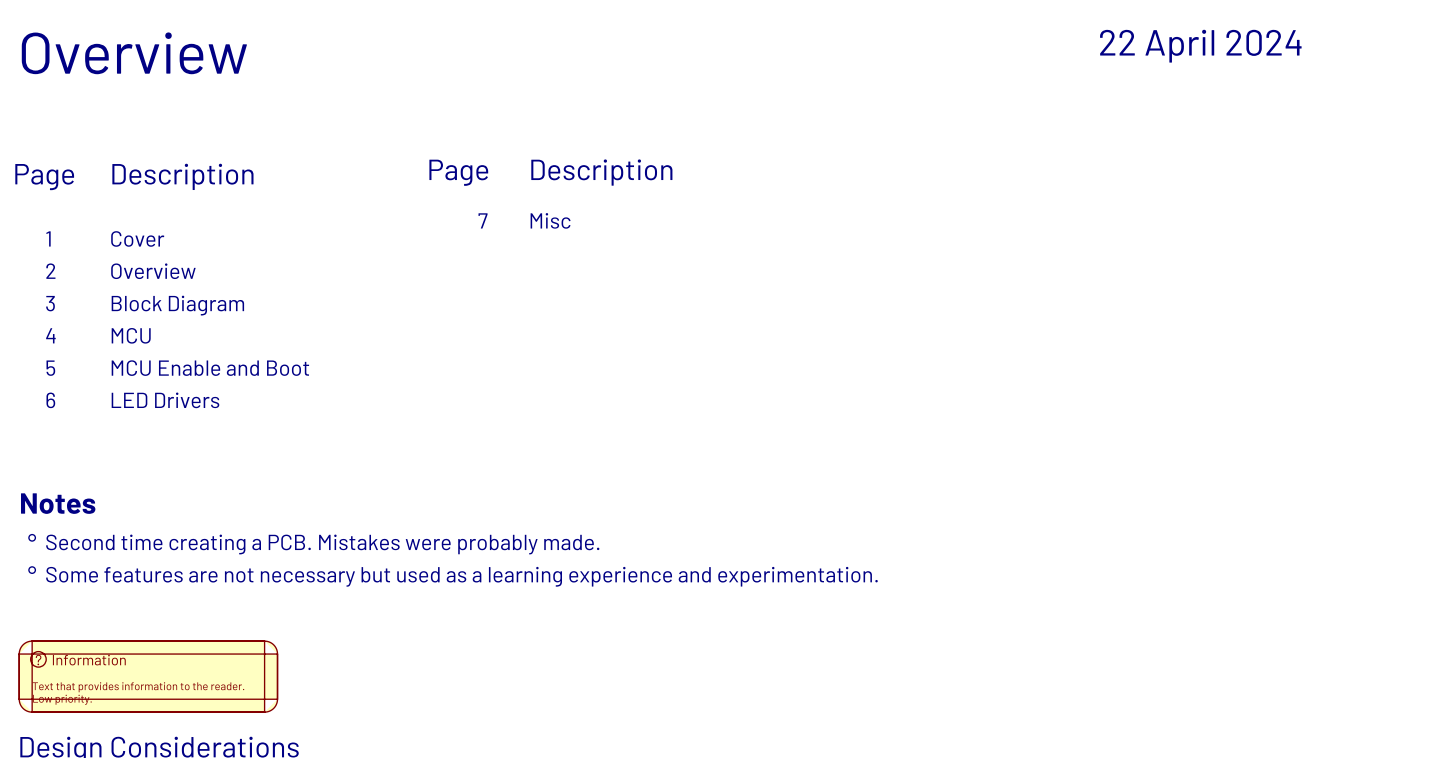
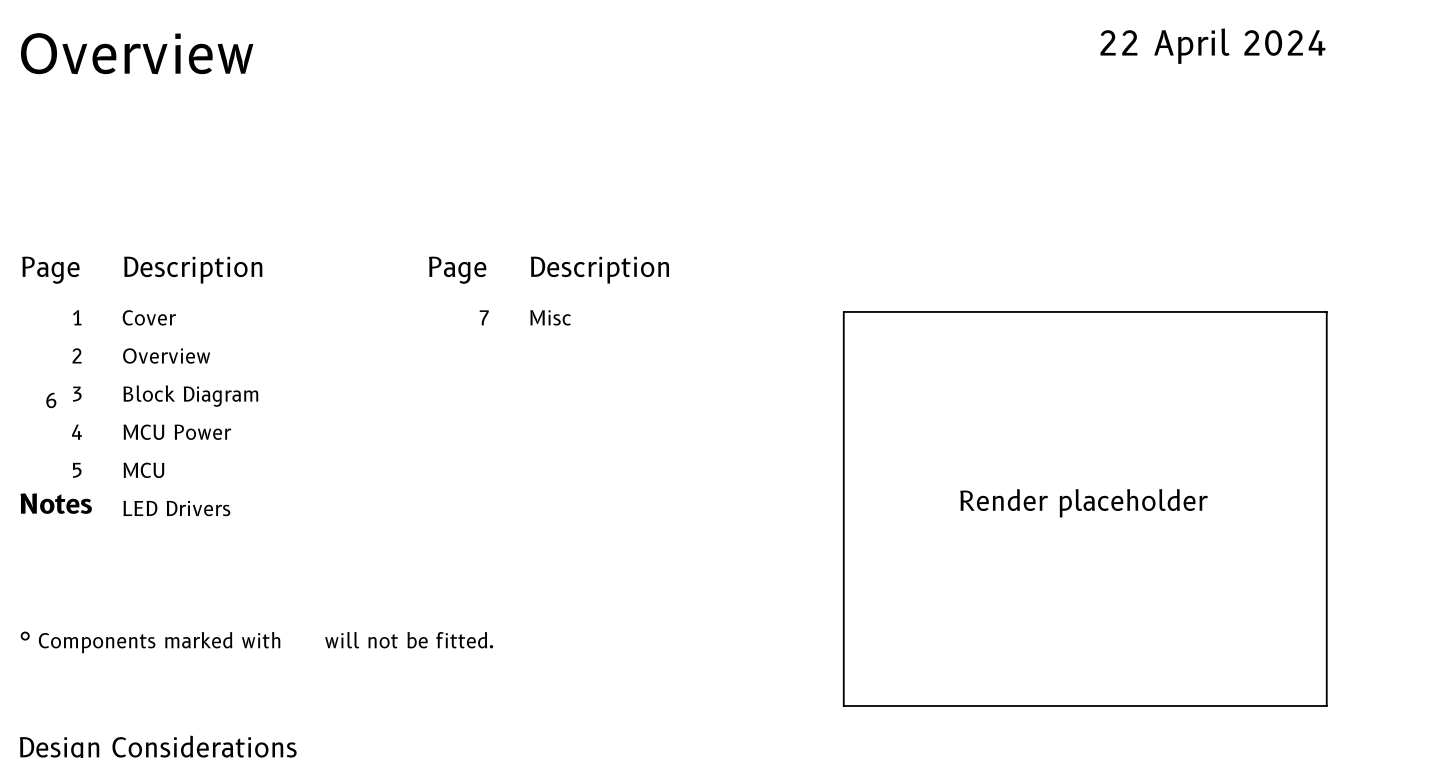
text position: Page (458, 172) -> Page (457, 270)
text position: Description (601, 172) -> Description (599, 270)
text position: Description (182, 176) -> Description (193, 270)
text position: Page (44, 177) -> Page (50, 270)
text position: 7 (483, 220) -> 7 (484, 317)
text position: Misc (550, 220) -> Misc (550, 317)
text position: 1 (48, 238) -> 1 (77, 317)
text position: Cover (137, 238) -> Cover (149, 317)
text position: 2 (50, 271) -> 2 (77, 355)
text position: Overview (153, 271) -> Overview (166, 356)
text position: 3 (50, 303) -> 3 (77, 394)
text position: Block Diagram (177, 305) -> Block Diagram (190, 396)
line: none -> (843, 311) (1326, 311) (1326, 705) (843, 705) (843, 311)
text position: 4 (50, 335) -> 4 (77, 432)
text: MCU (131, 335) -> none
text position: 5 (50, 368) -> 5 (77, 470)
text: MCU Enable and Boot (210, 368) -> none
text position: LED Drivers (165, 400) -> LED Drivers (176, 508)
text: none -> MCU Power (177, 432)
text: none -> MCU (143, 470)
text: none -> Render placeholder (1083, 503)
drawing: [28, 534, 36, 542] -> none
text: Second time creating a PCB. Mistakes were probably made. (322, 544) -> none
drawing: [28, 566, 36, 574] -> none
text: Some features are not necessary but used as a learning experience and experimentation. (461, 576) -> none
drawing: none -> [21, 632, 29, 640]
text: none -> Components marked with will not be fitted. (266, 642)
part: (148, 676) -> none

